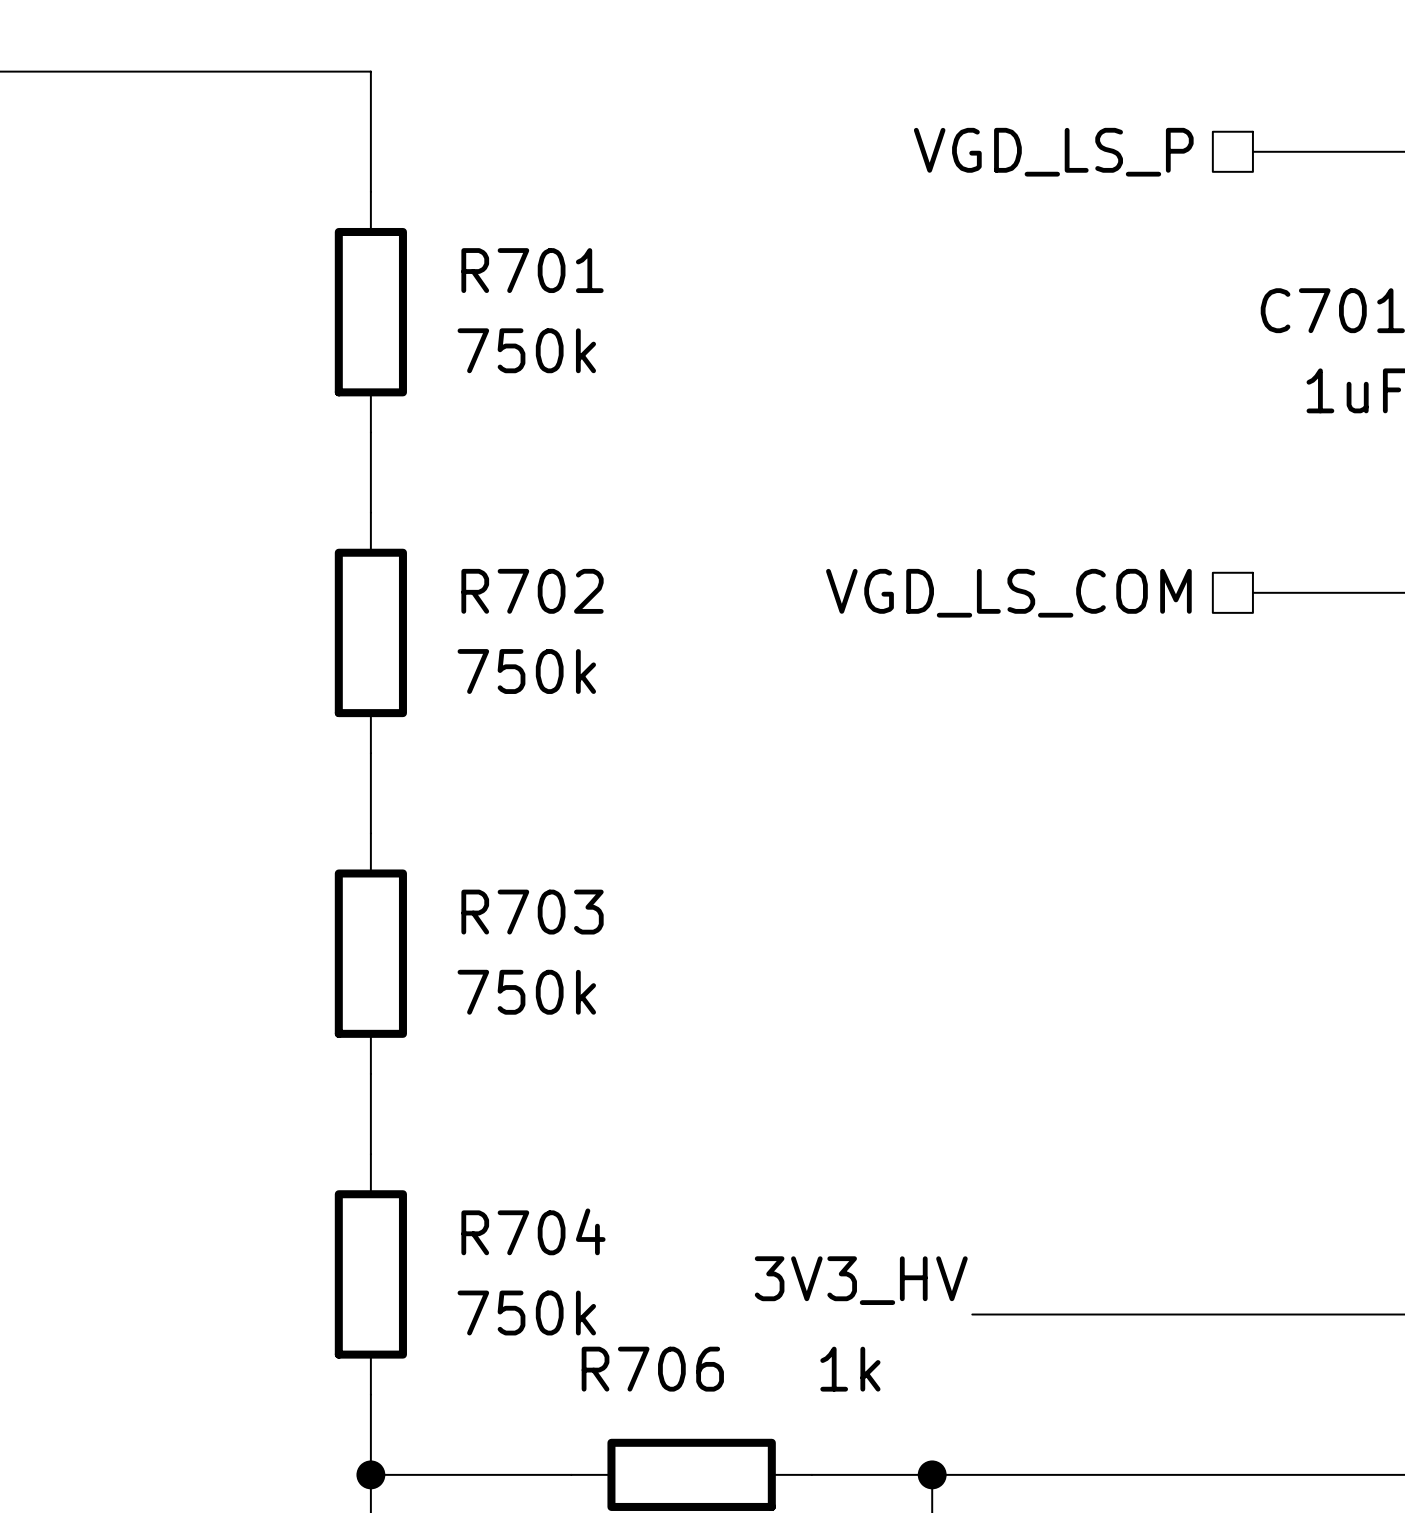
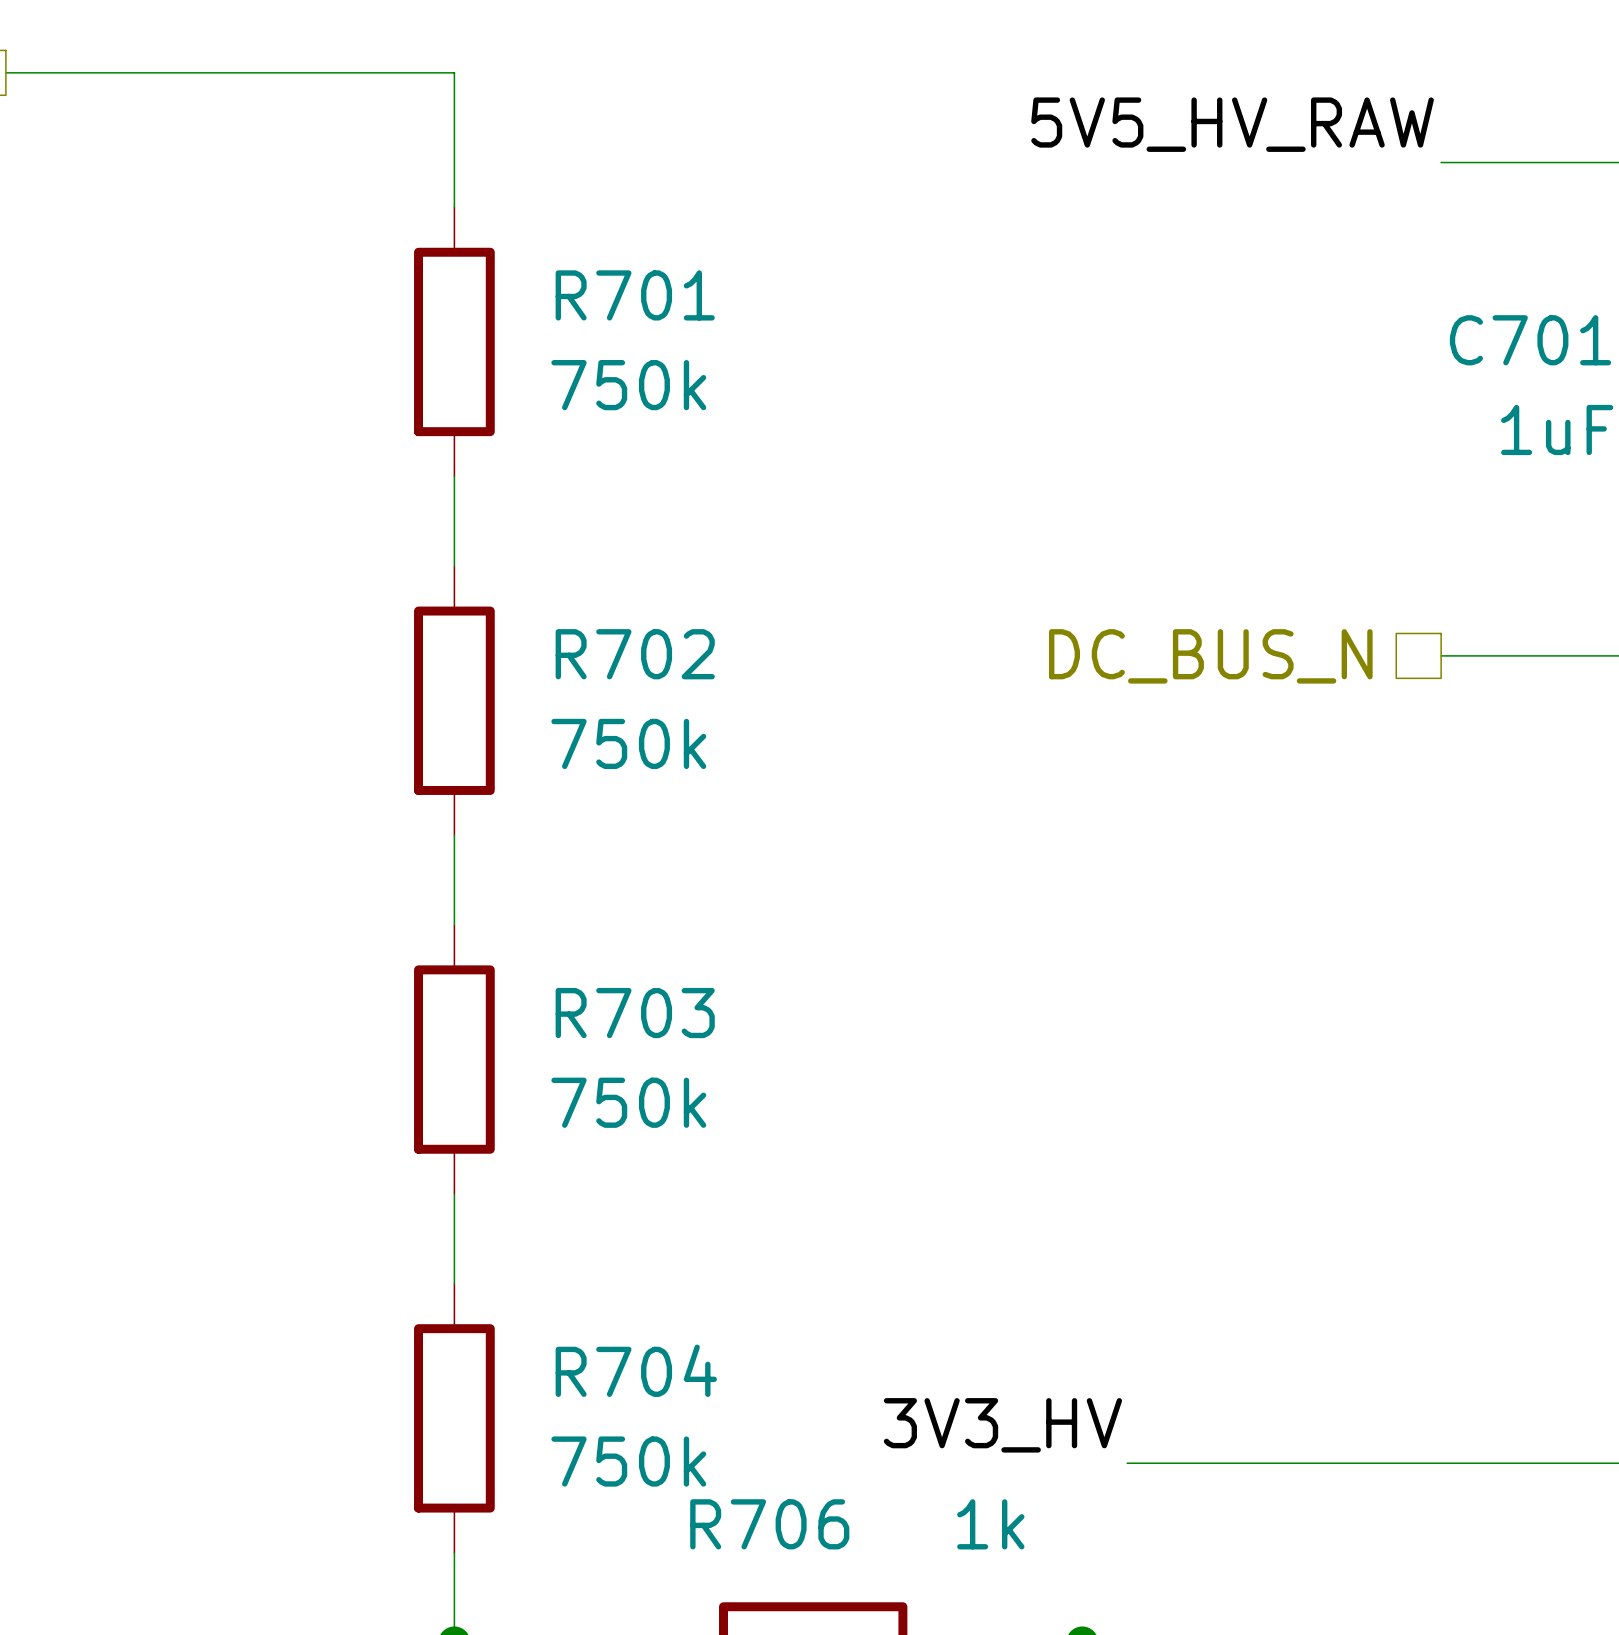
label: none -> 5V5_HV_RAW (1232, 124)
hierarchical label: VGD_LS_P (1053, 152) -> none
hierarchical label: VGD_LS_COM (1008, 593) -> DC_BUS_N (1210, 656)

